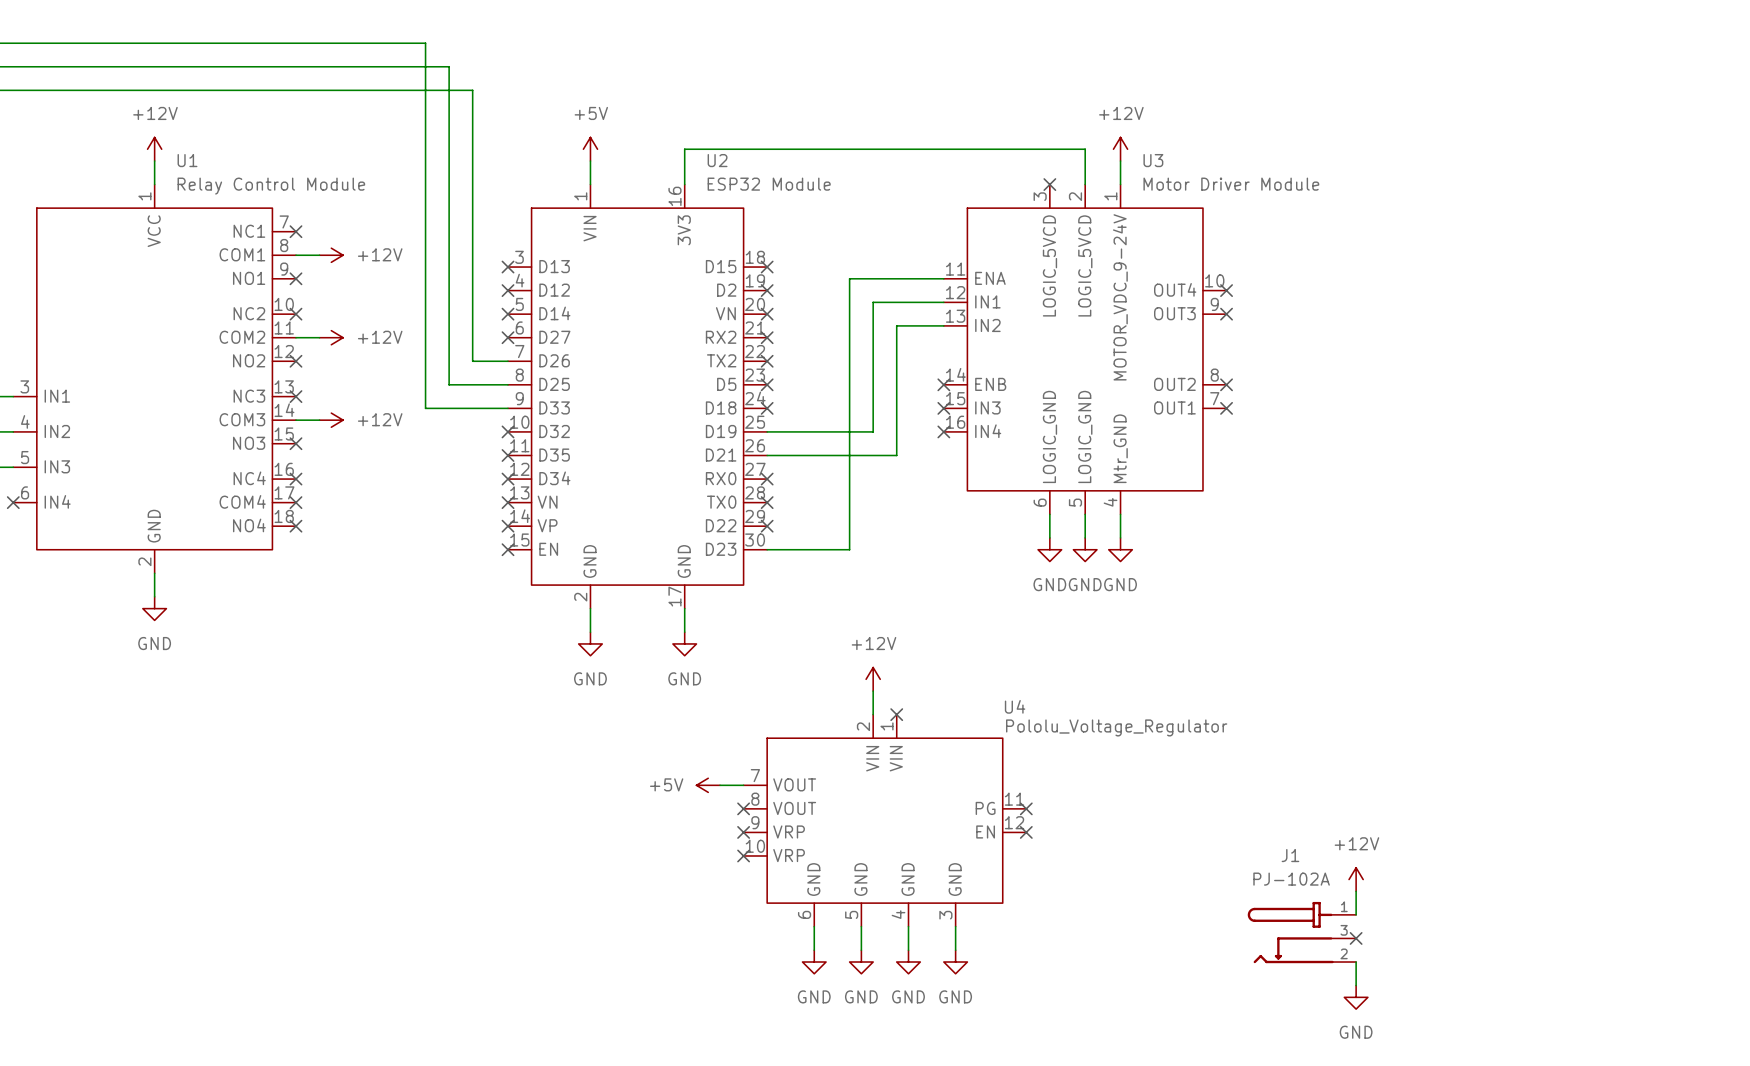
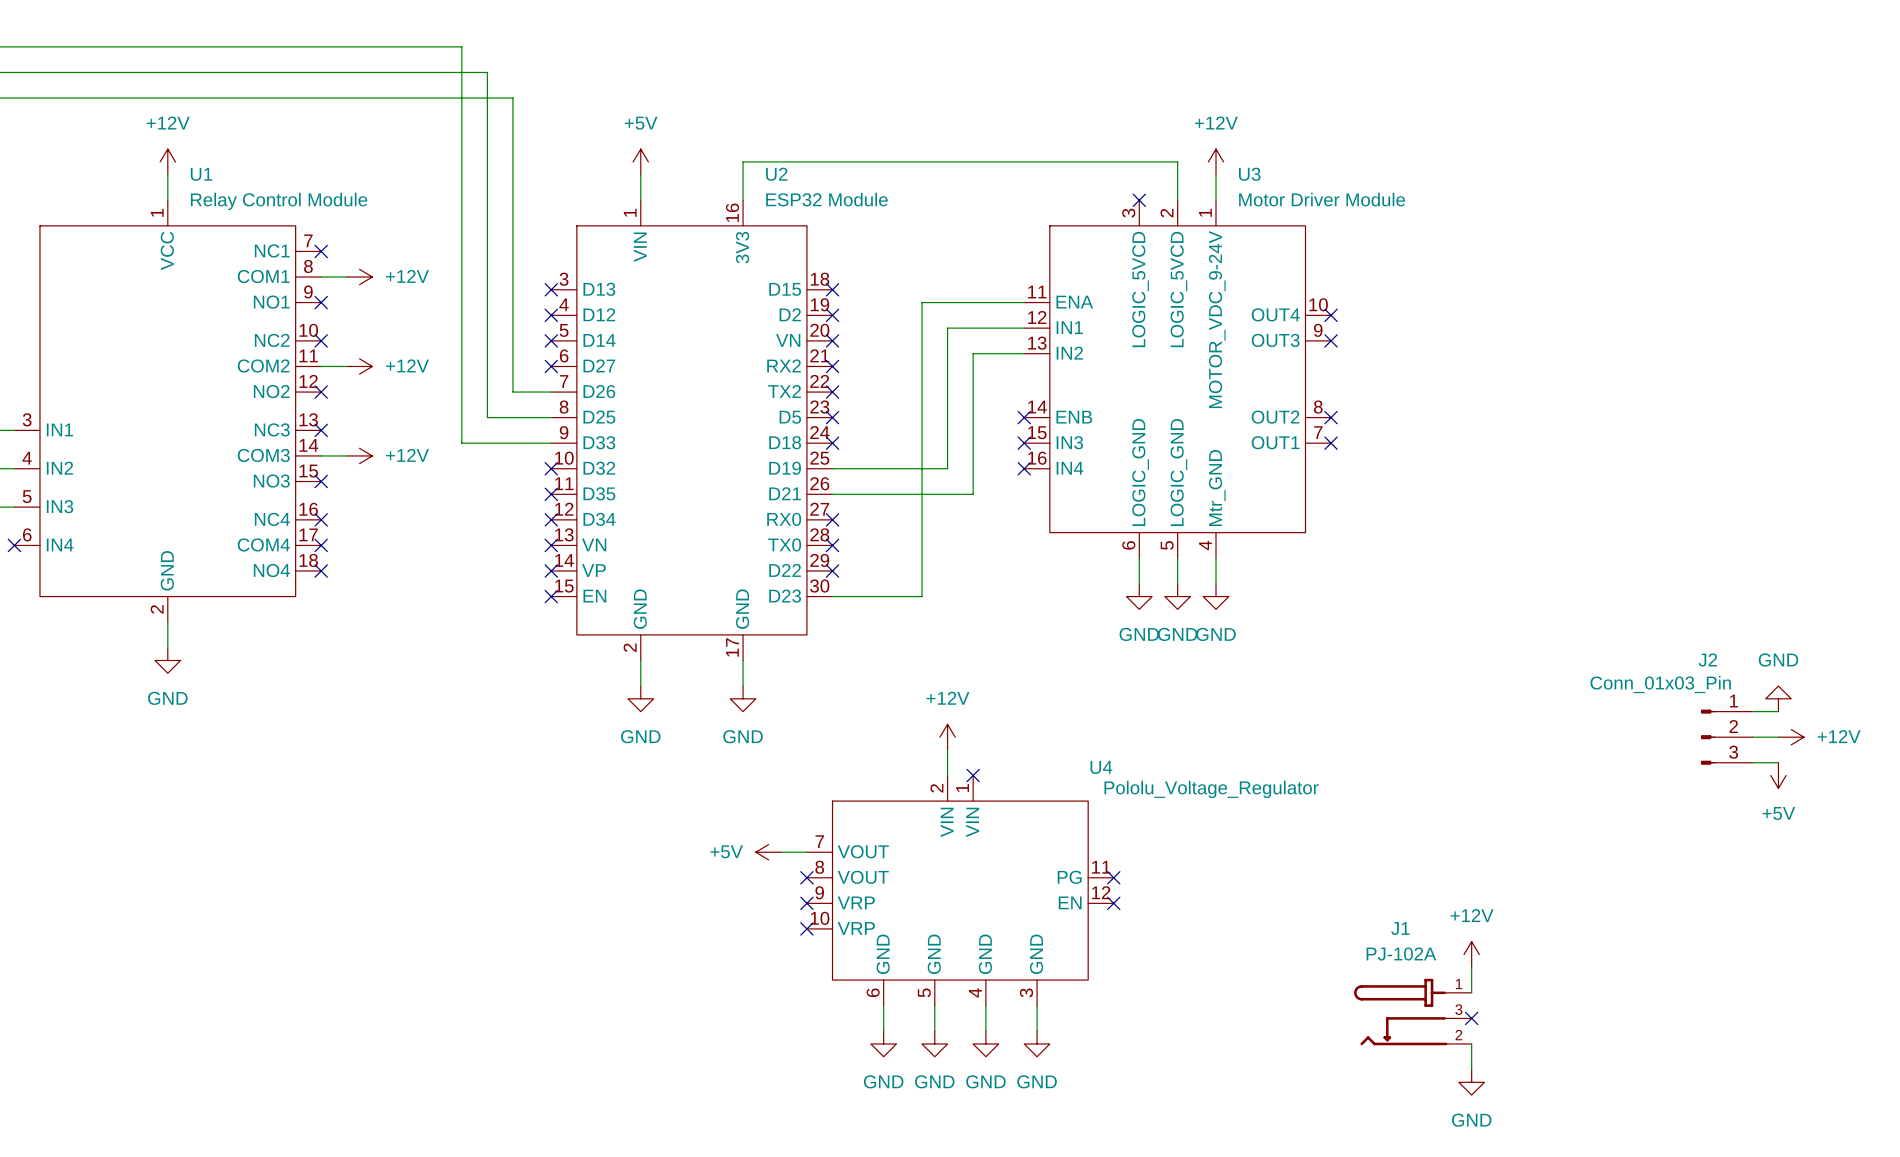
power symbol: none -> GND (1778, 698)
wire: none -> (1752, 711) (1778, 711)
J2: none -> Conn_01x03_Pin (1726, 737)
wire: none -> (1752, 737) (1778, 737)
power symbol: none -> +12V (1791, 737)
wire: none -> (1752, 762) (1778, 762)
power symbol: none -> +5V (1778, 775)

